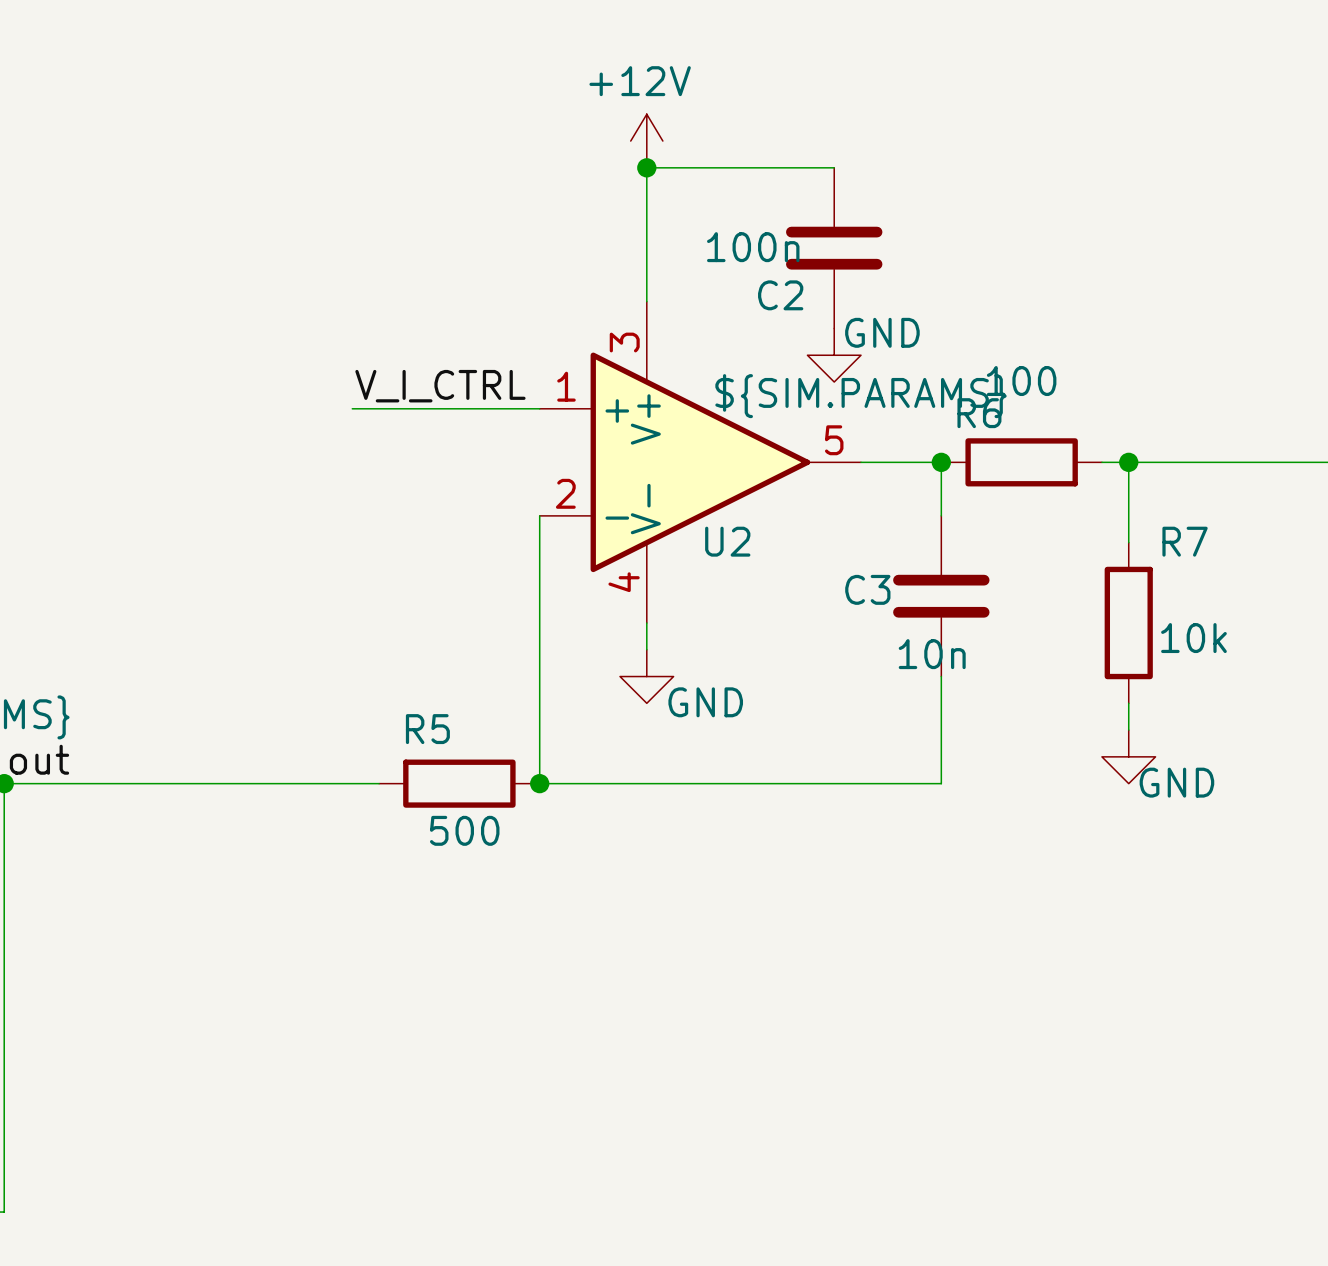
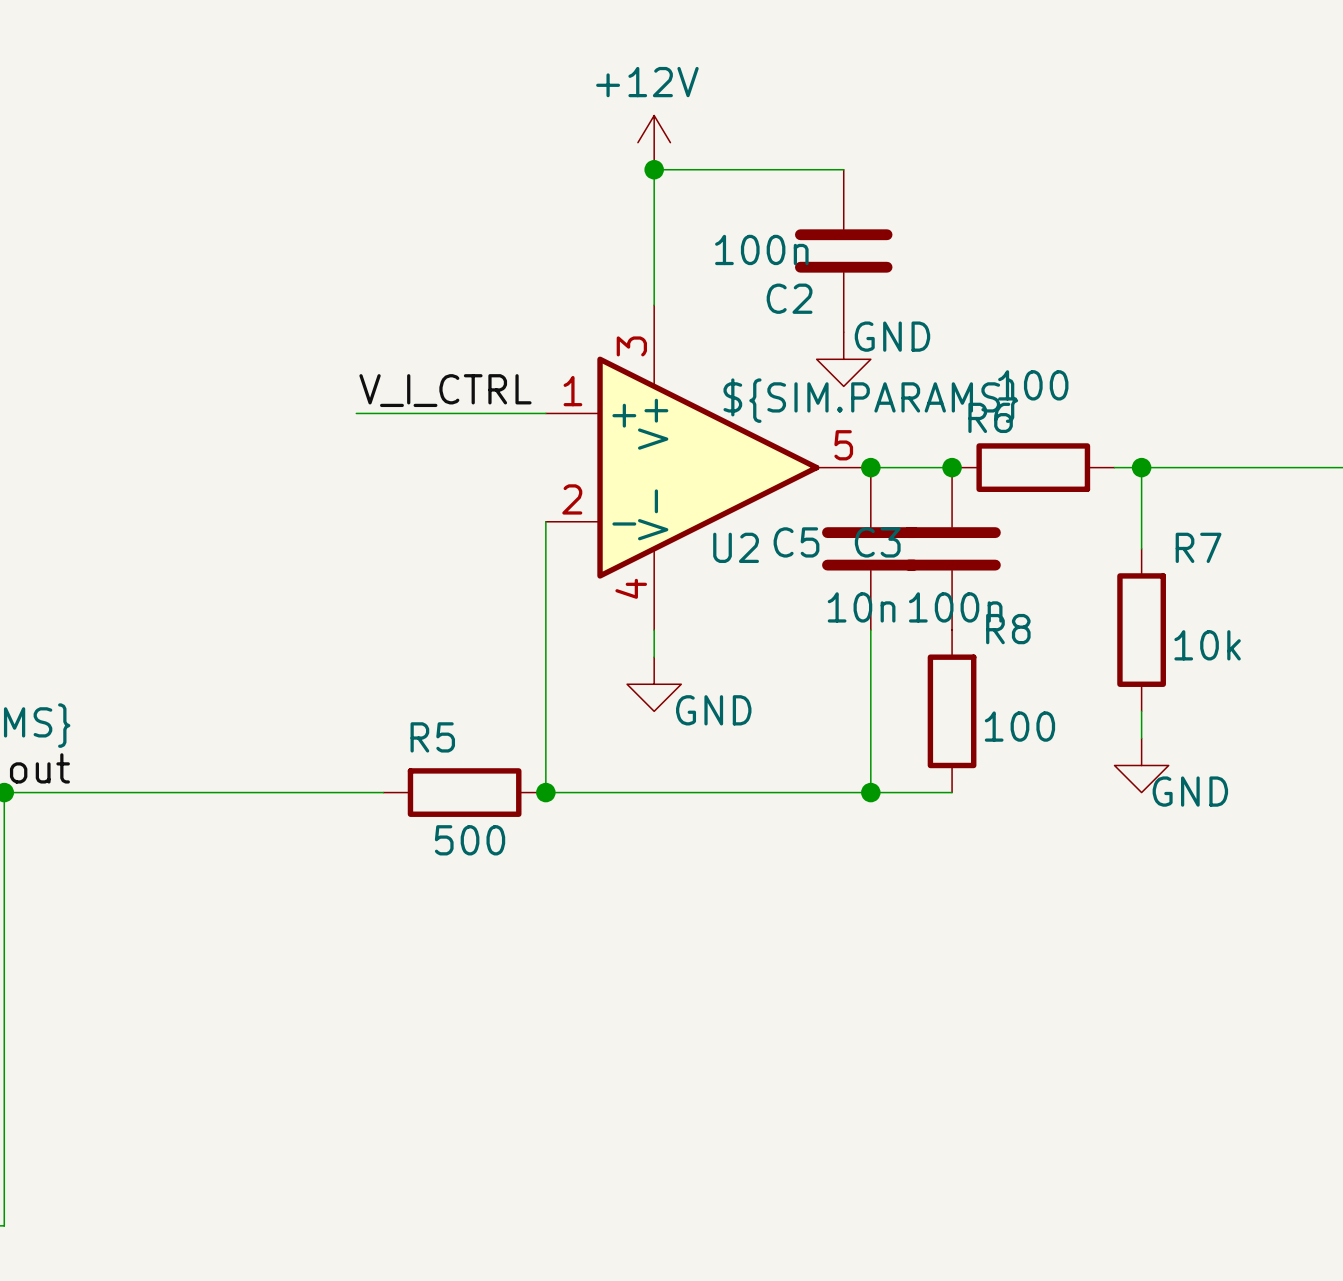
junction: none -> (870, 467)
C5: none -> 10n (870, 548)
C3 position: (941, 596) -> (952, 548)
wire: none -> (870, 630) (870, 792)
C3 value: 10n (932, 654) -> 100n (955, 607)
wire: (941, 676) (941, 783) -> none
R8: none -> 100 (952, 711)
junction: none -> (870, 792)

